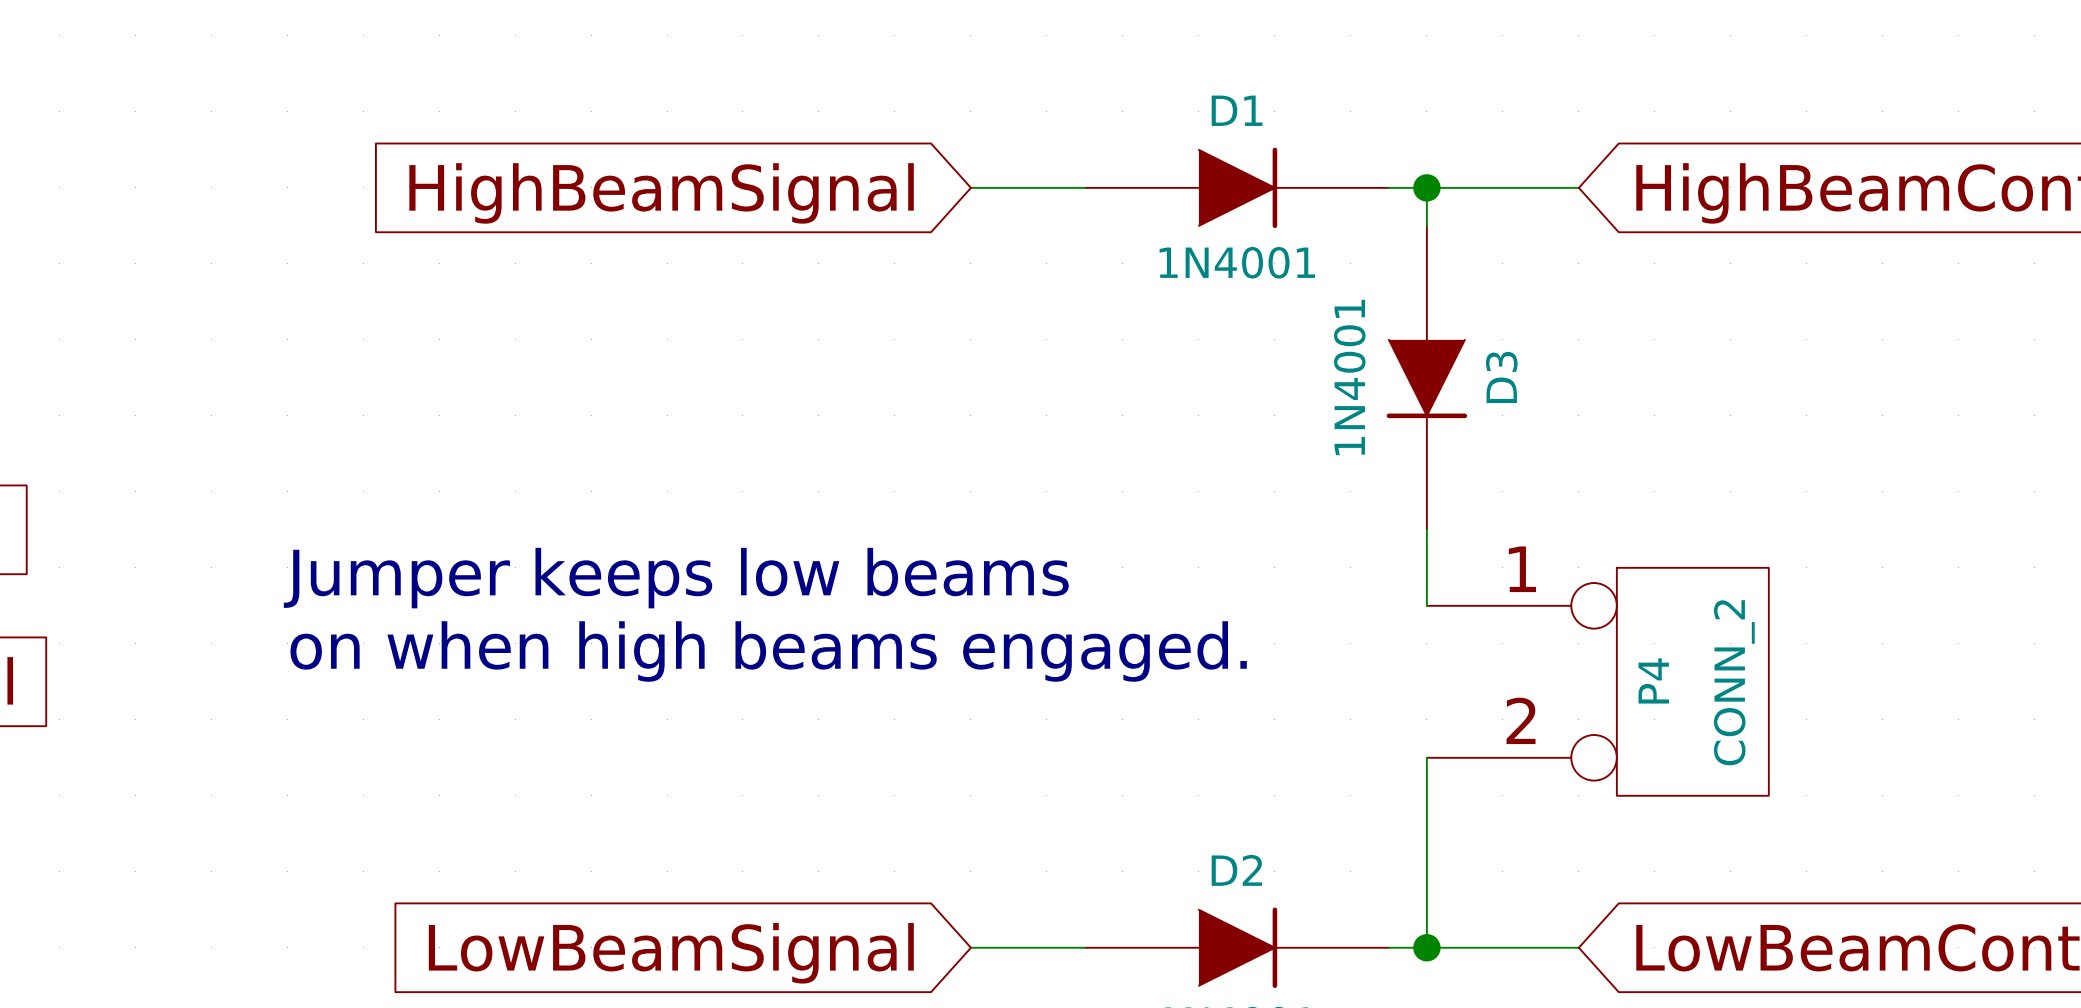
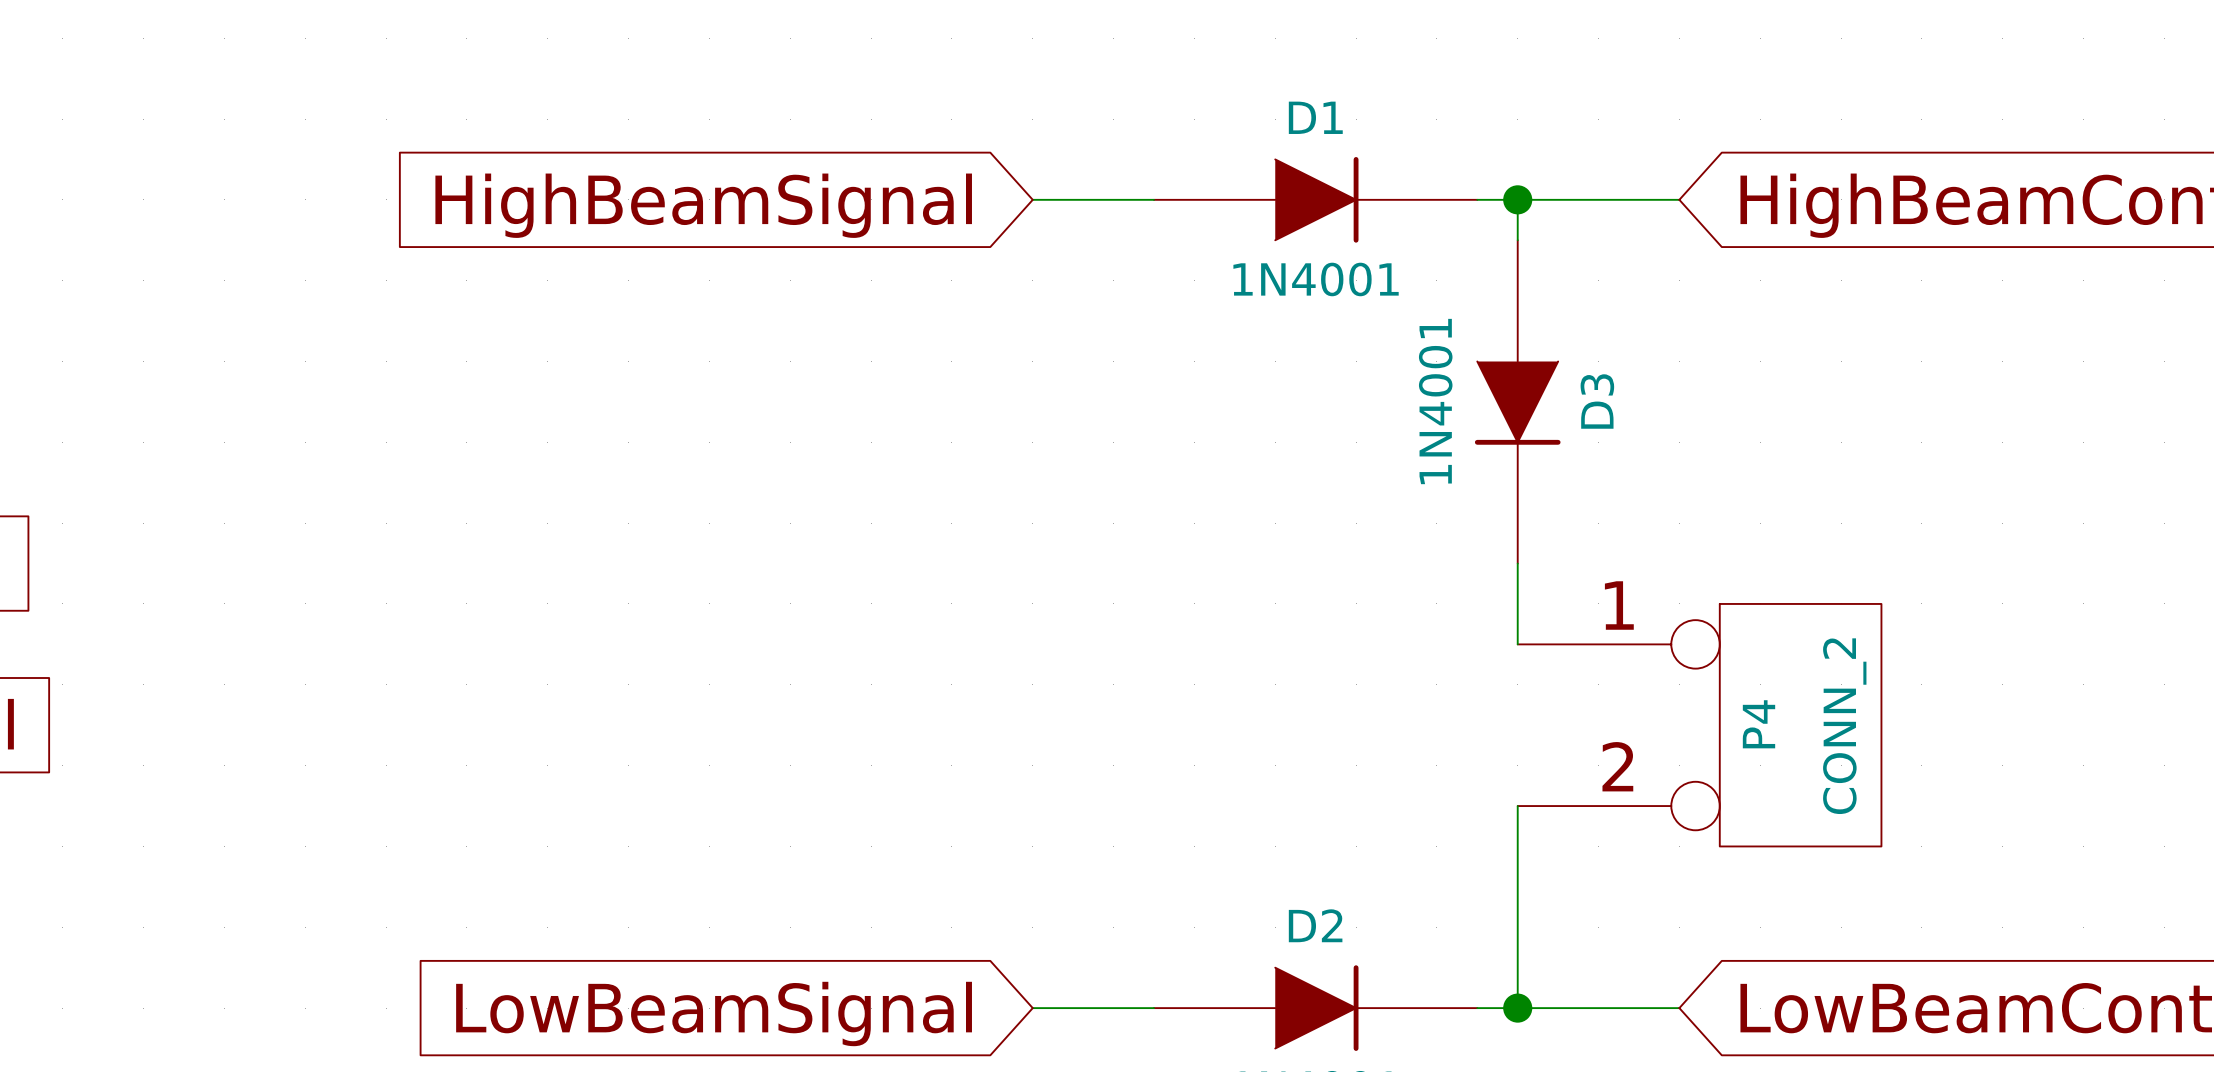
text: Jumper keeps low beams (676, 578) -> none
text: on when high beams engaged. (768, 651) -> none

